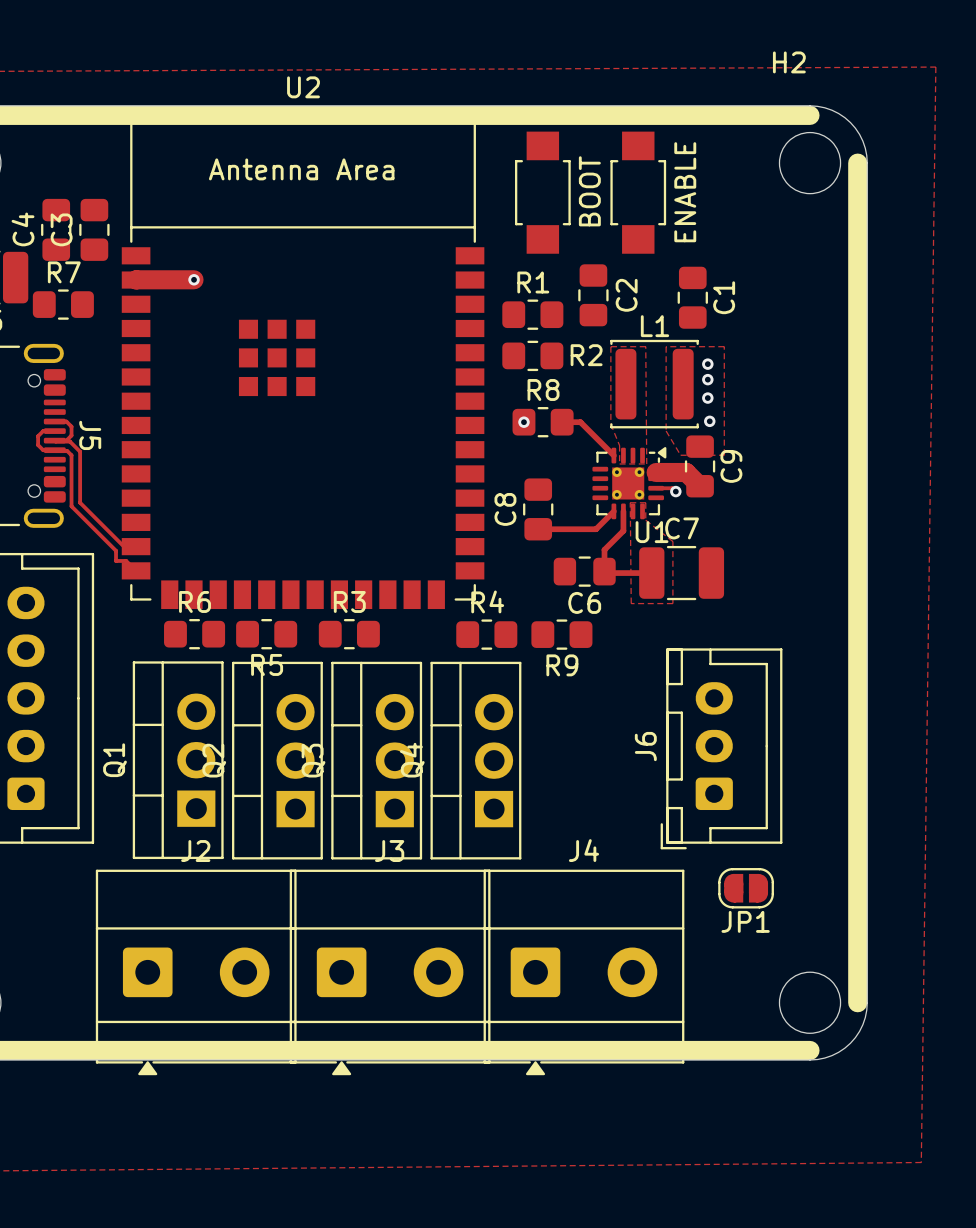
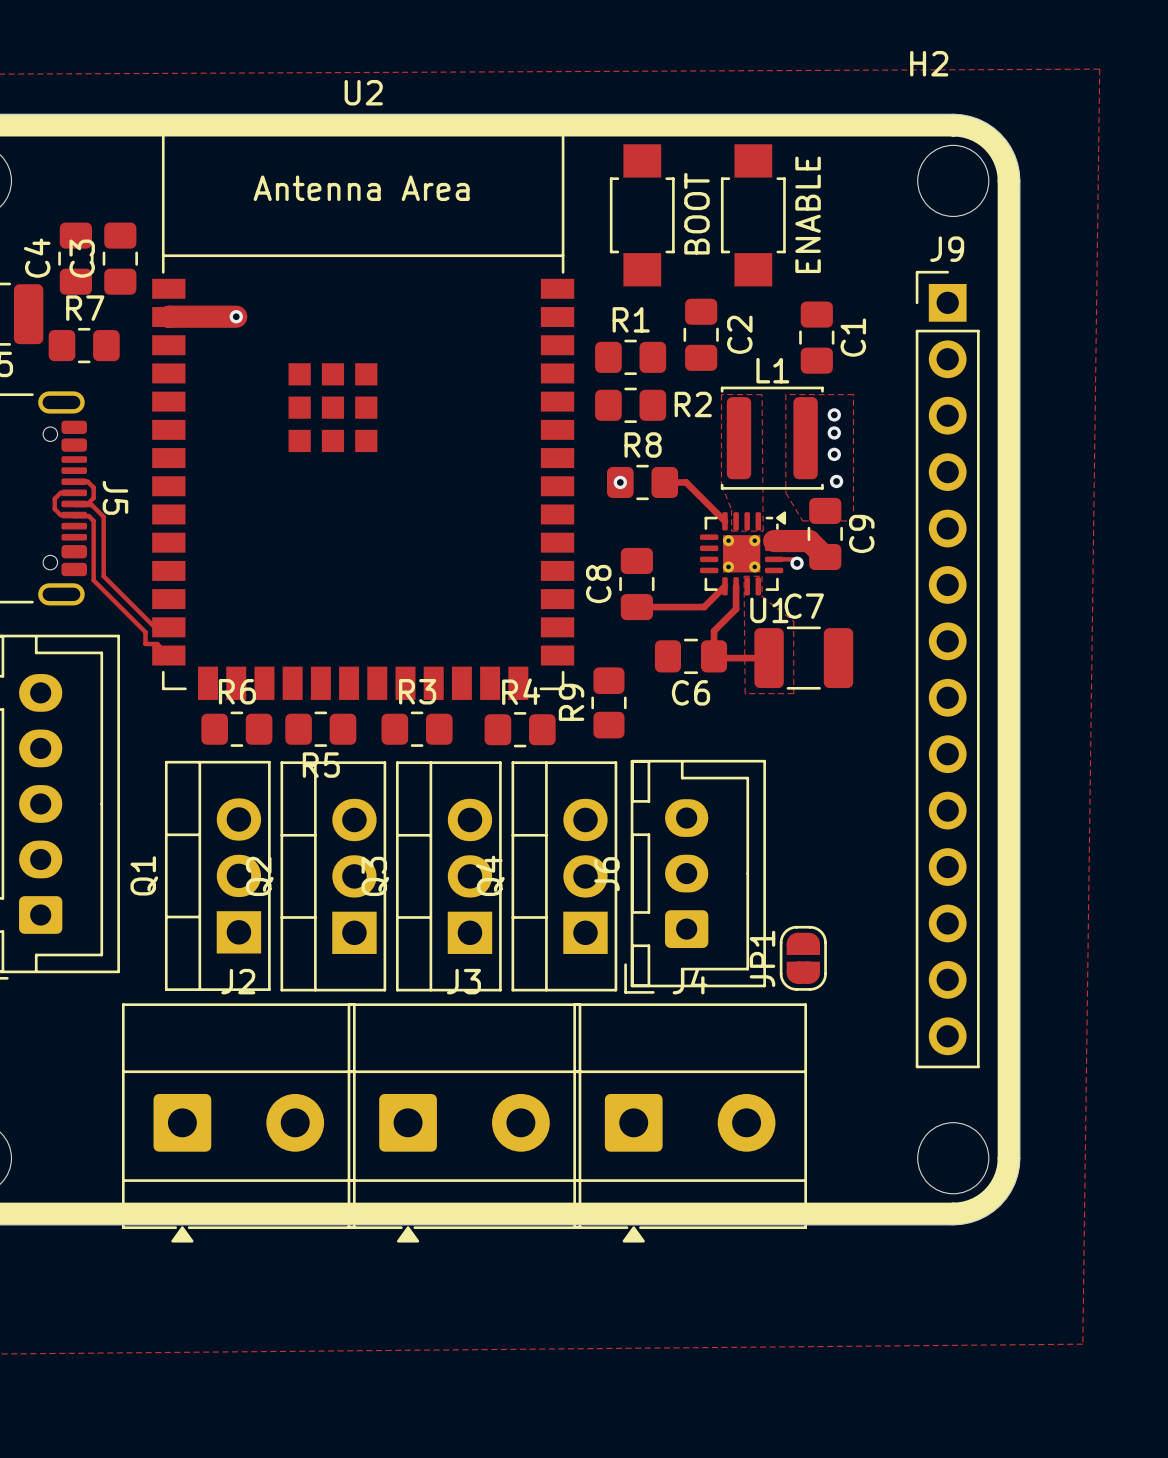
line: none -> (953, 125) (977, 130) (992, 141) (1003, 156) (1008, 180)
J9: none -> (947, 669)
R4 position: (486, 634) -> (520, 729)
R9 rotation: 0° (561, 634) -> 90° clockwise (608, 702)
R9 position: (561, 634) -> (608, 702)
J6 position: (721, 748) -> (695, 876)
JP1 rotation: 0° (746, 888) -> 90° clockwise (803, 958)
JP1 position: (746, 888) -> (803, 958)
line: none -> (1008, 1158) (1003, 1182) (992, 1197) (977, 1208) (953, 1213)

